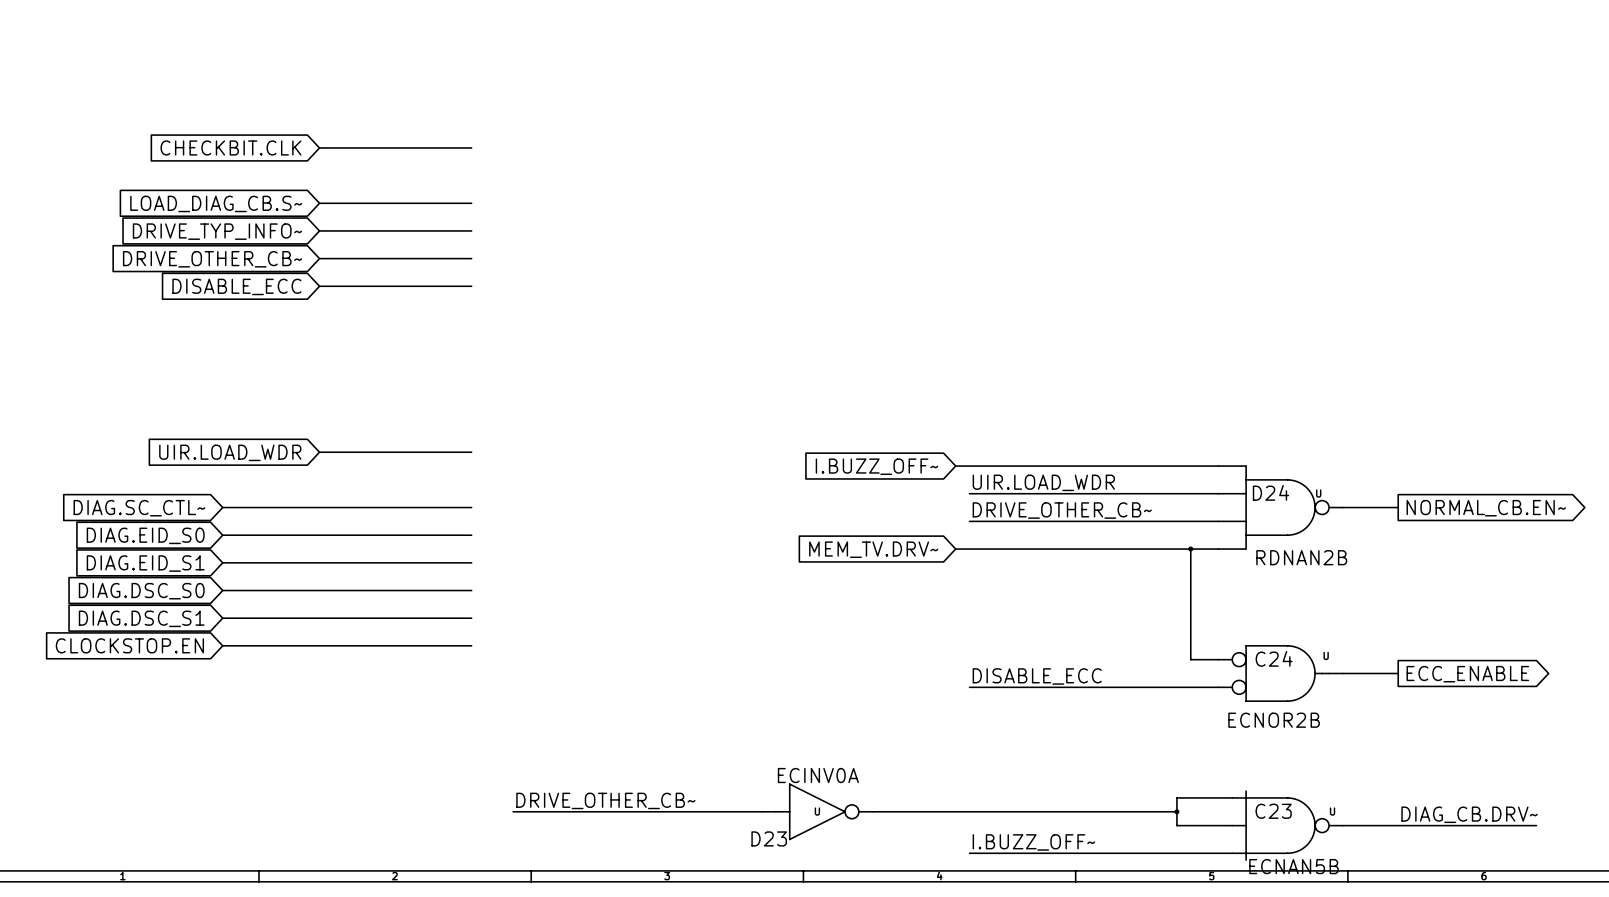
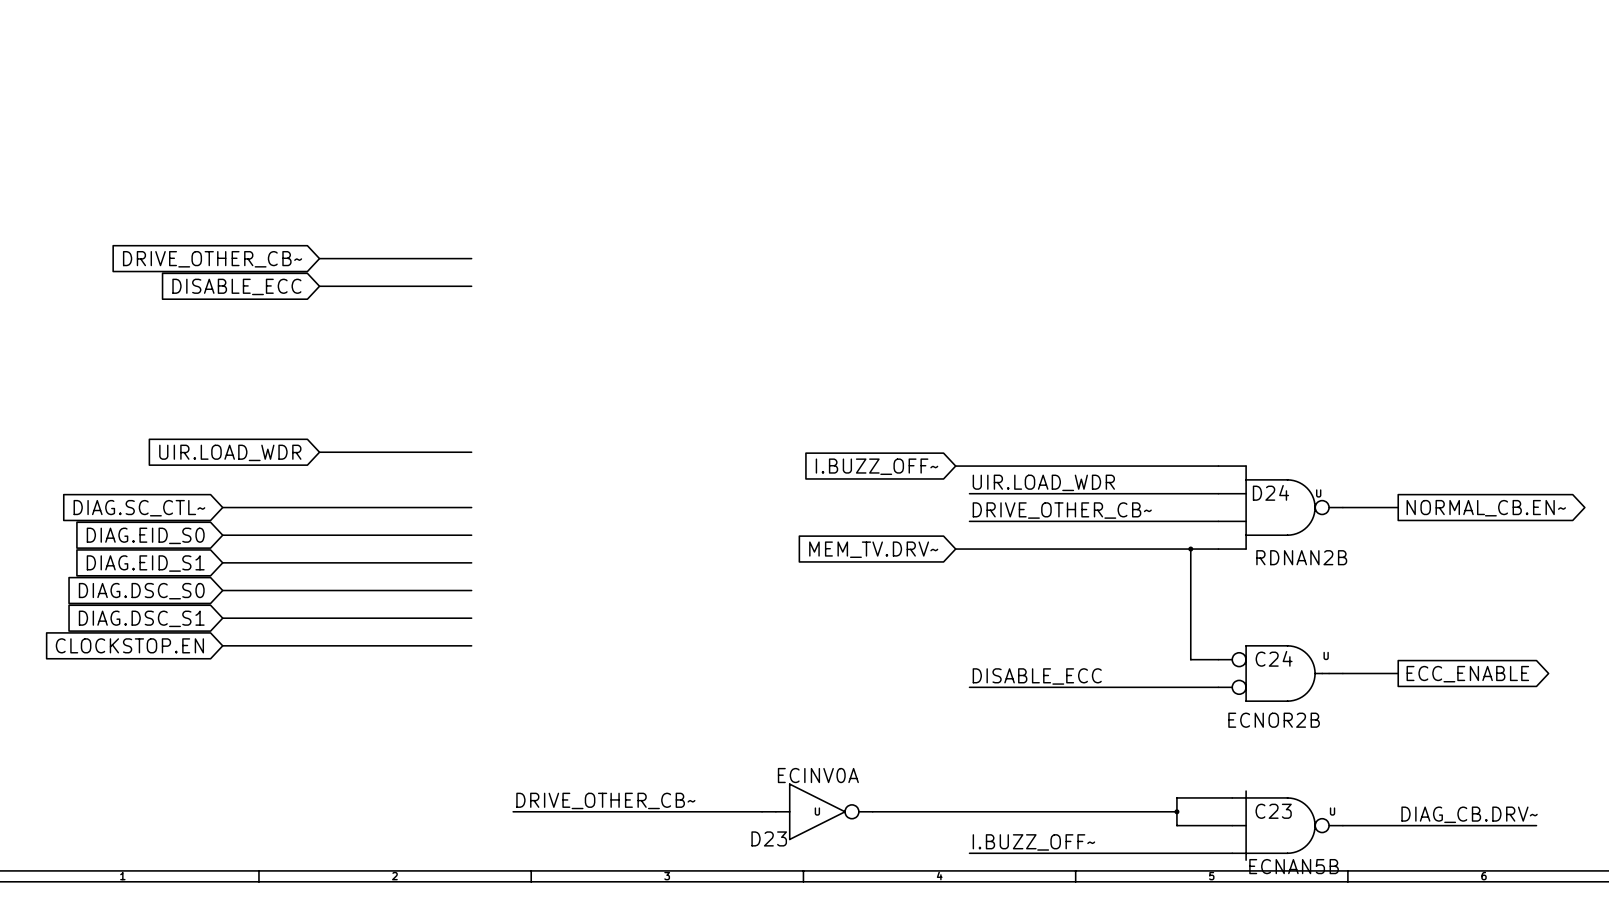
global label: CHECKBIT.CLK (230, 147) -> none
wire: (319, 147) (471, 147) -> none
global label: LOAD_DIAG_CB.S~ (216, 203) -> none
wire: (319, 203) (471, 203) -> none
wire: (319, 230) (471, 230) -> none
global label: DRIVE_TYP_INFO~ (217, 231) -> none

